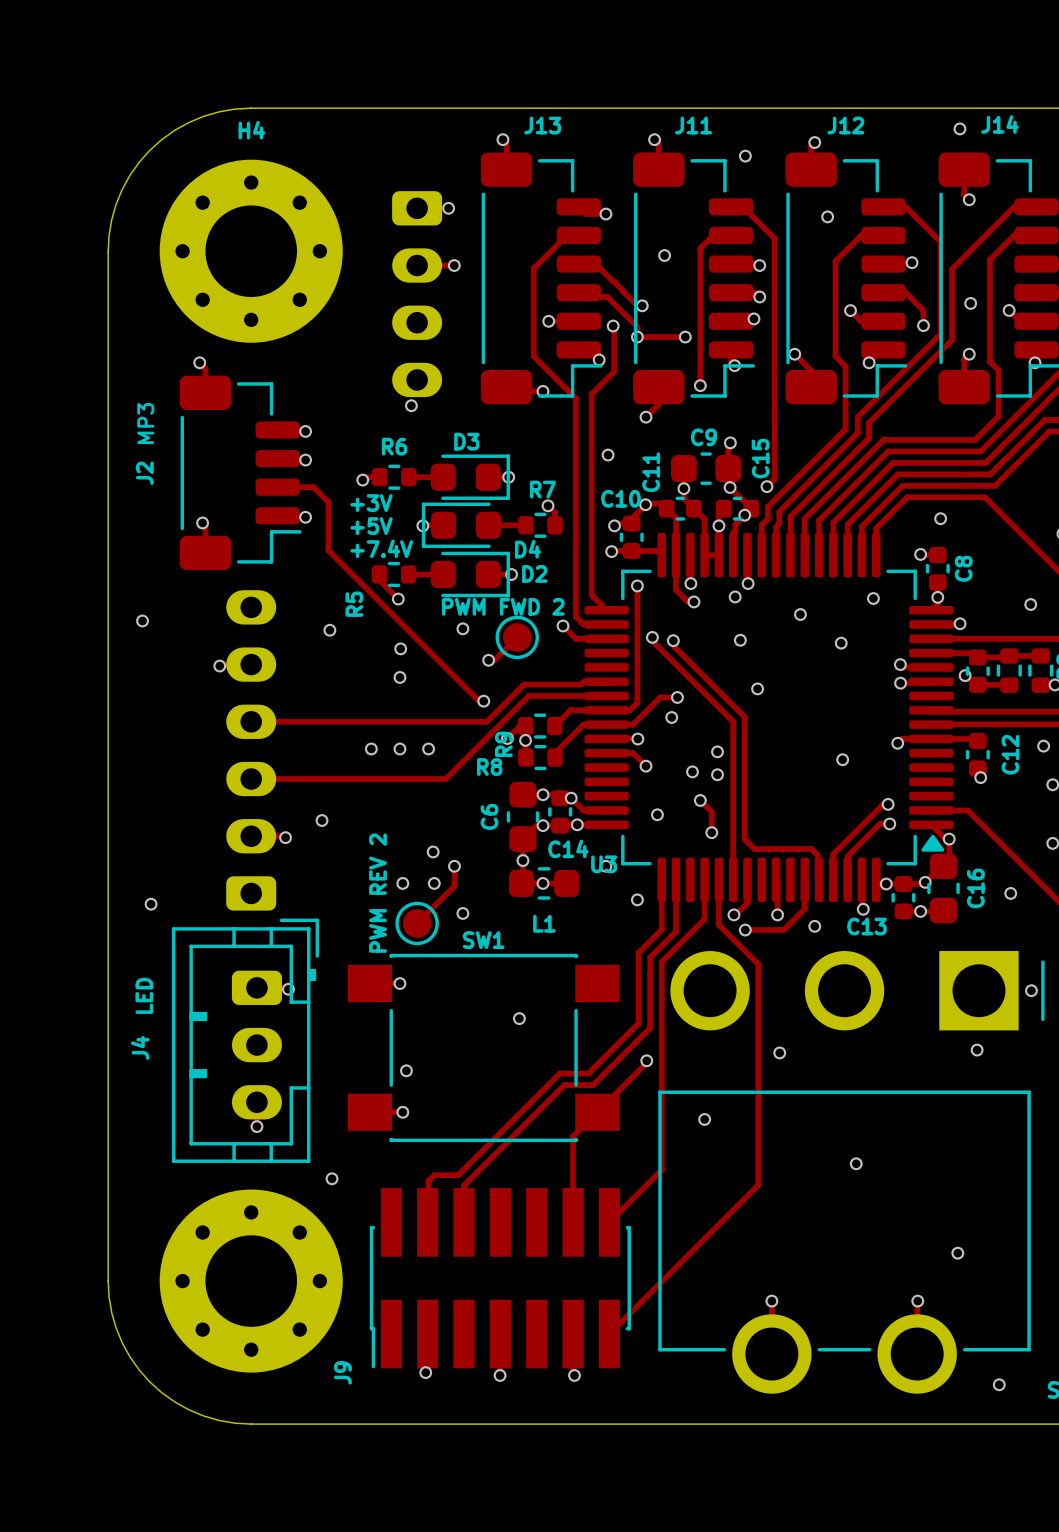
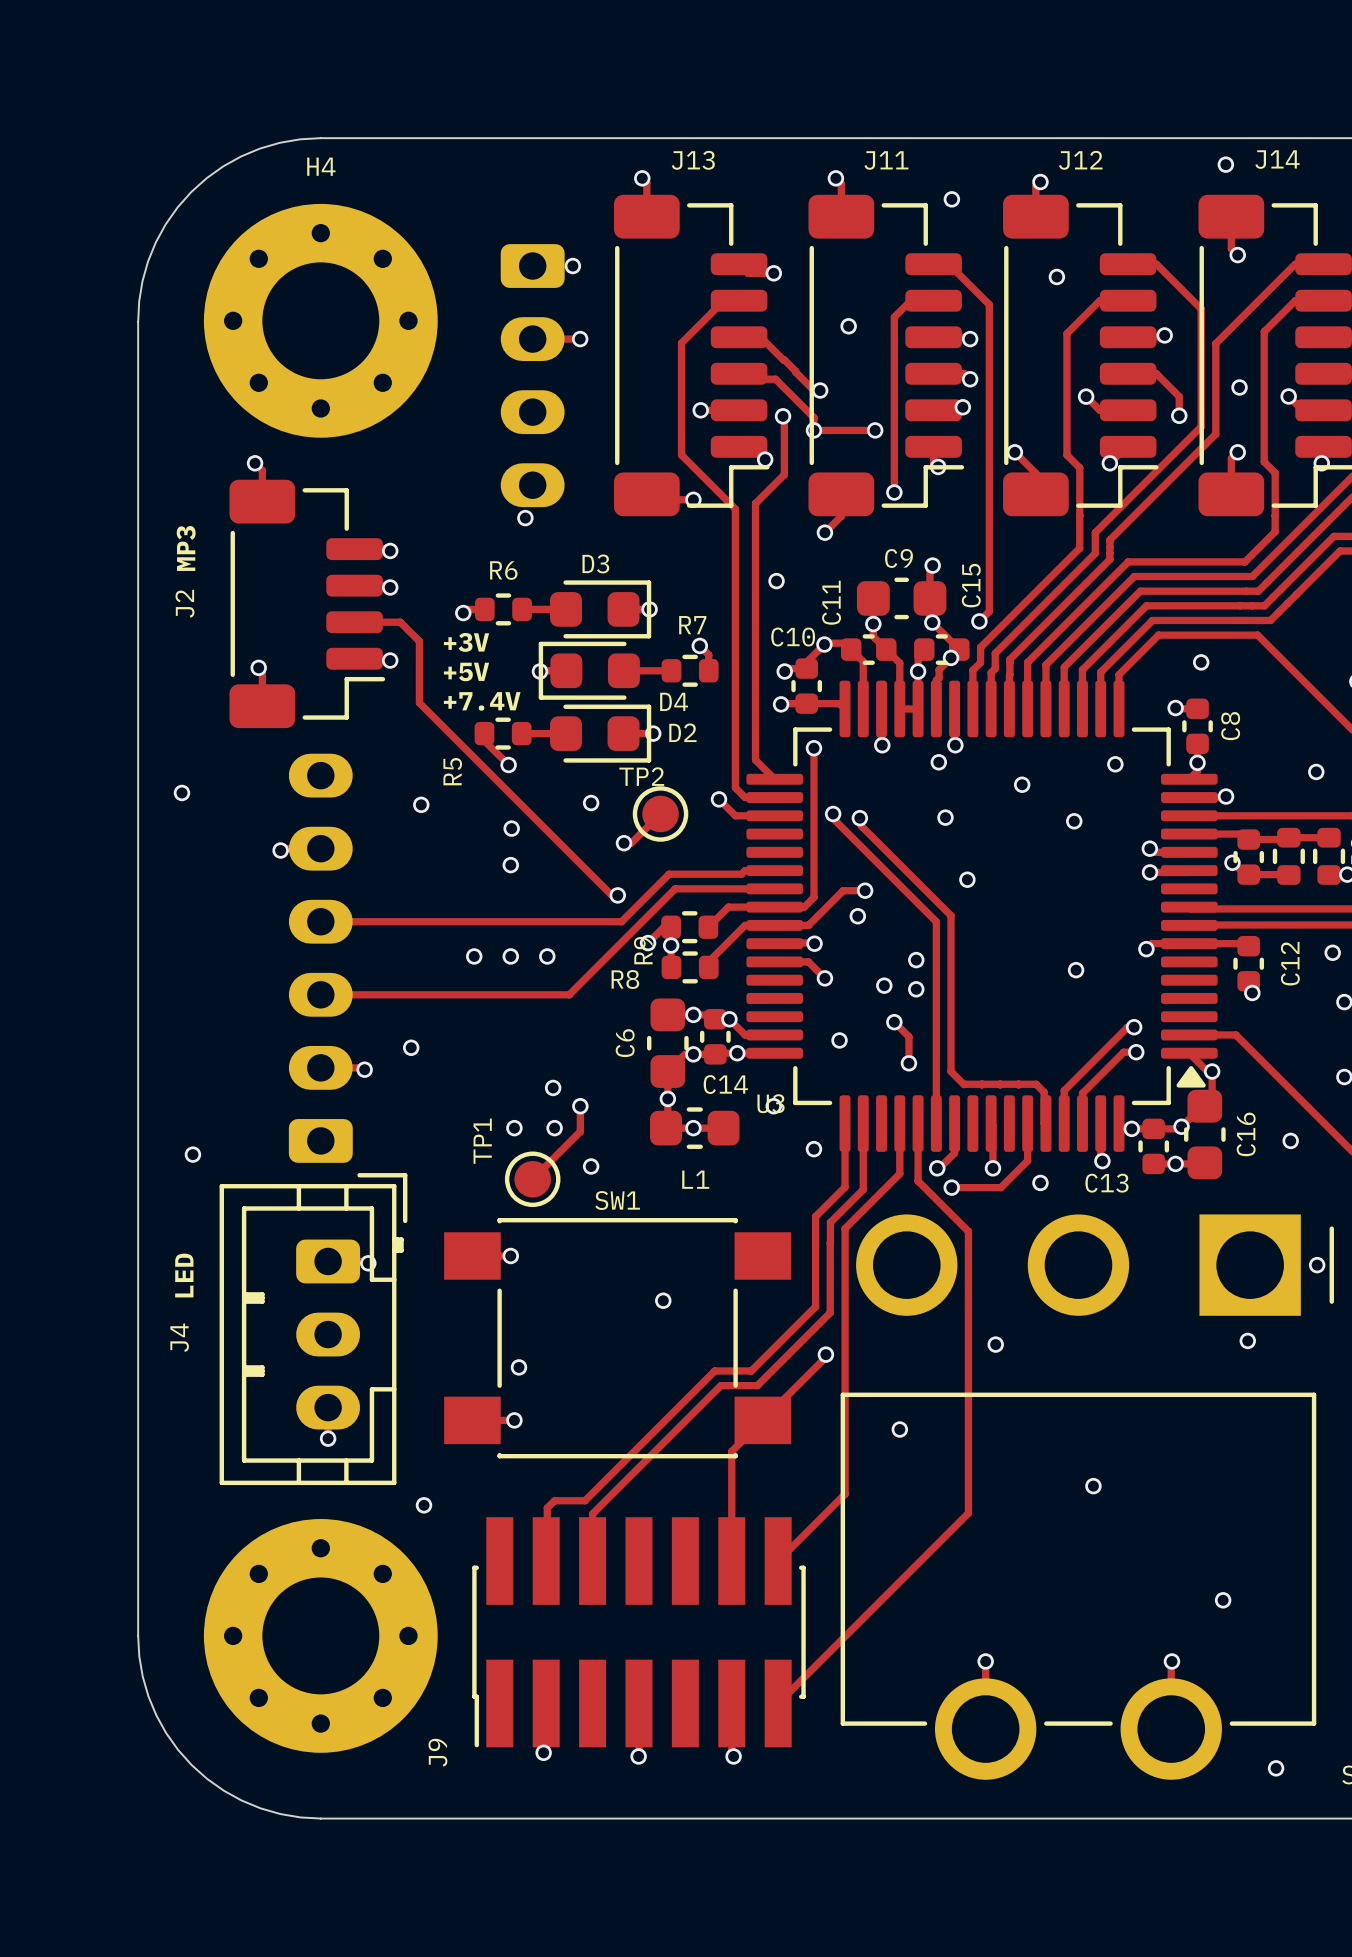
track: (675, 555) (675, 589) (687, 601) (693, 601) -> none
via: (693, 601) -> none
PWM FWD 2 name: PWM FWD 2 (503, 606) -> TP2 (641, 776)
PWM REV 2 name: PWM REV 2 (377, 893) -> TP1 (482, 1141)

